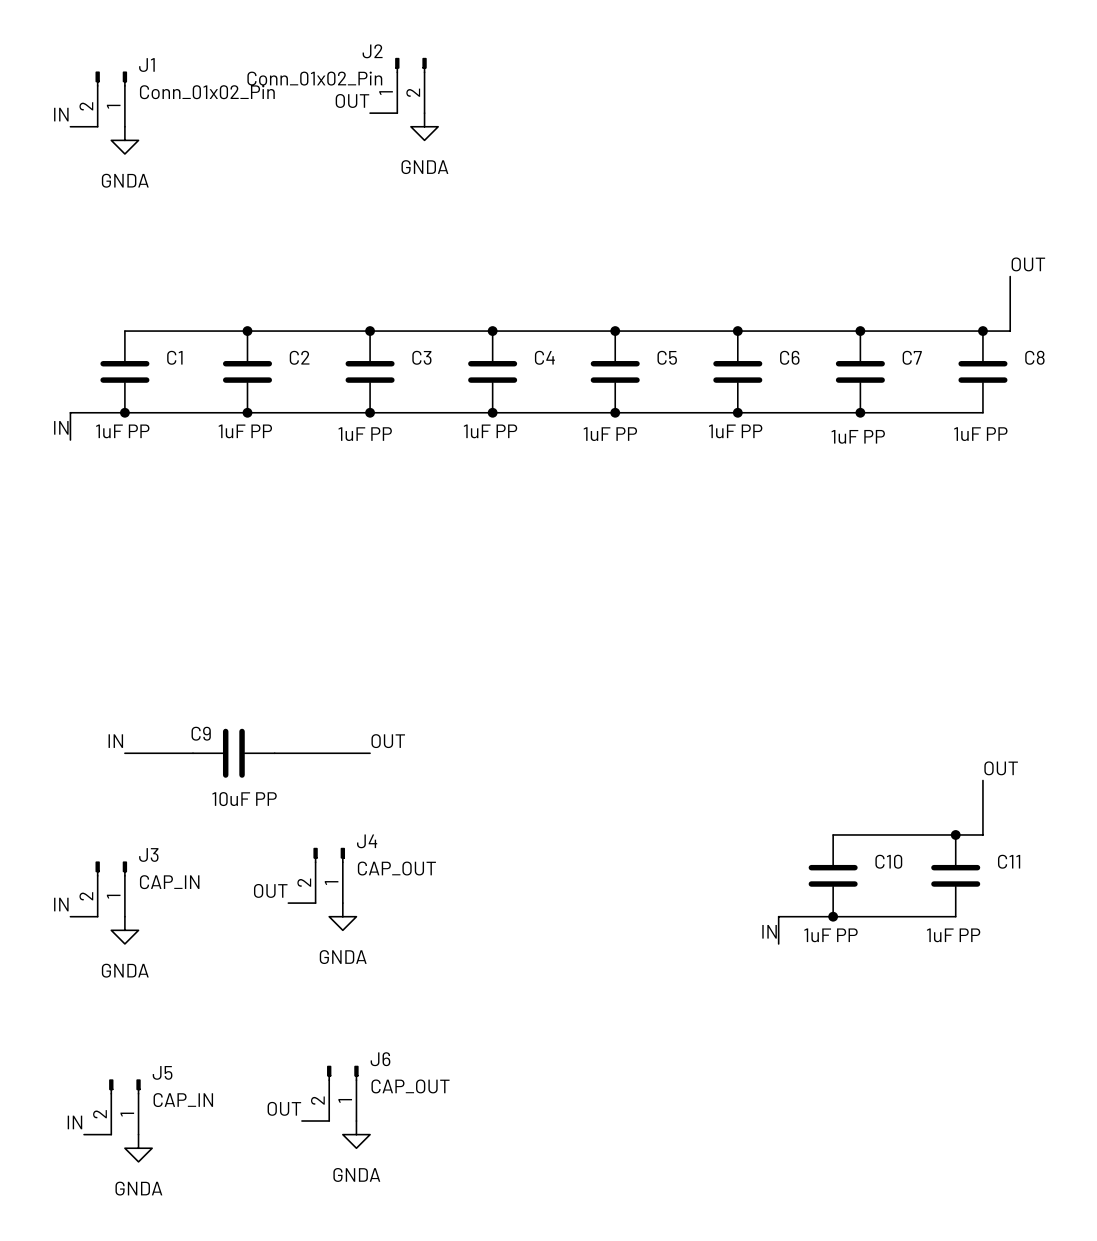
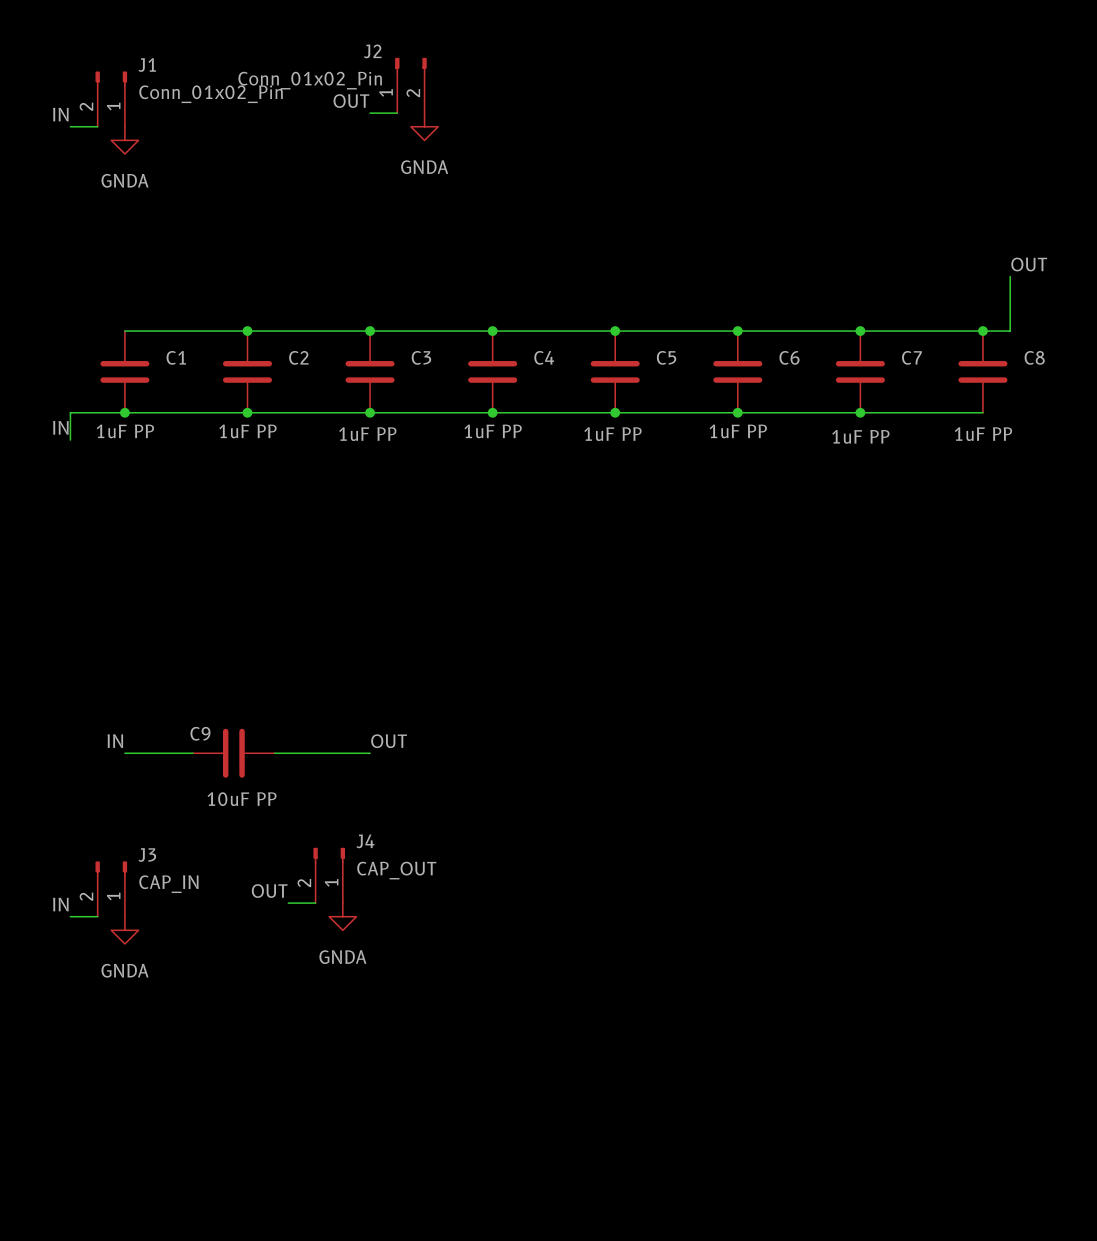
label: OUT (1001, 768) -> none
wire: (982, 780) (982, 834) (833, 834) -> none
junction: (955, 834) -> none
C10: 1uF PP (833, 875) -> none
C11: 1uF PP (955, 875) -> none
junction: (833, 916) -> none
wire: (955, 916) (778, 916) (778, 943) -> none
label: IN (769, 931) -> none
J6: CAP_OUT (342, 1093) -> none
J5: CAP_IN (124, 1106) -> none
label: OUT (284, 1108) -> none
wire: (301, 1121) (329, 1121) -> none
label: IN (74, 1122) -> none
wire: (84, 1134) (111, 1134) -> none
power symbol: GNDA (356, 1134) -> none
power symbol: GNDA (138, 1148) -> none

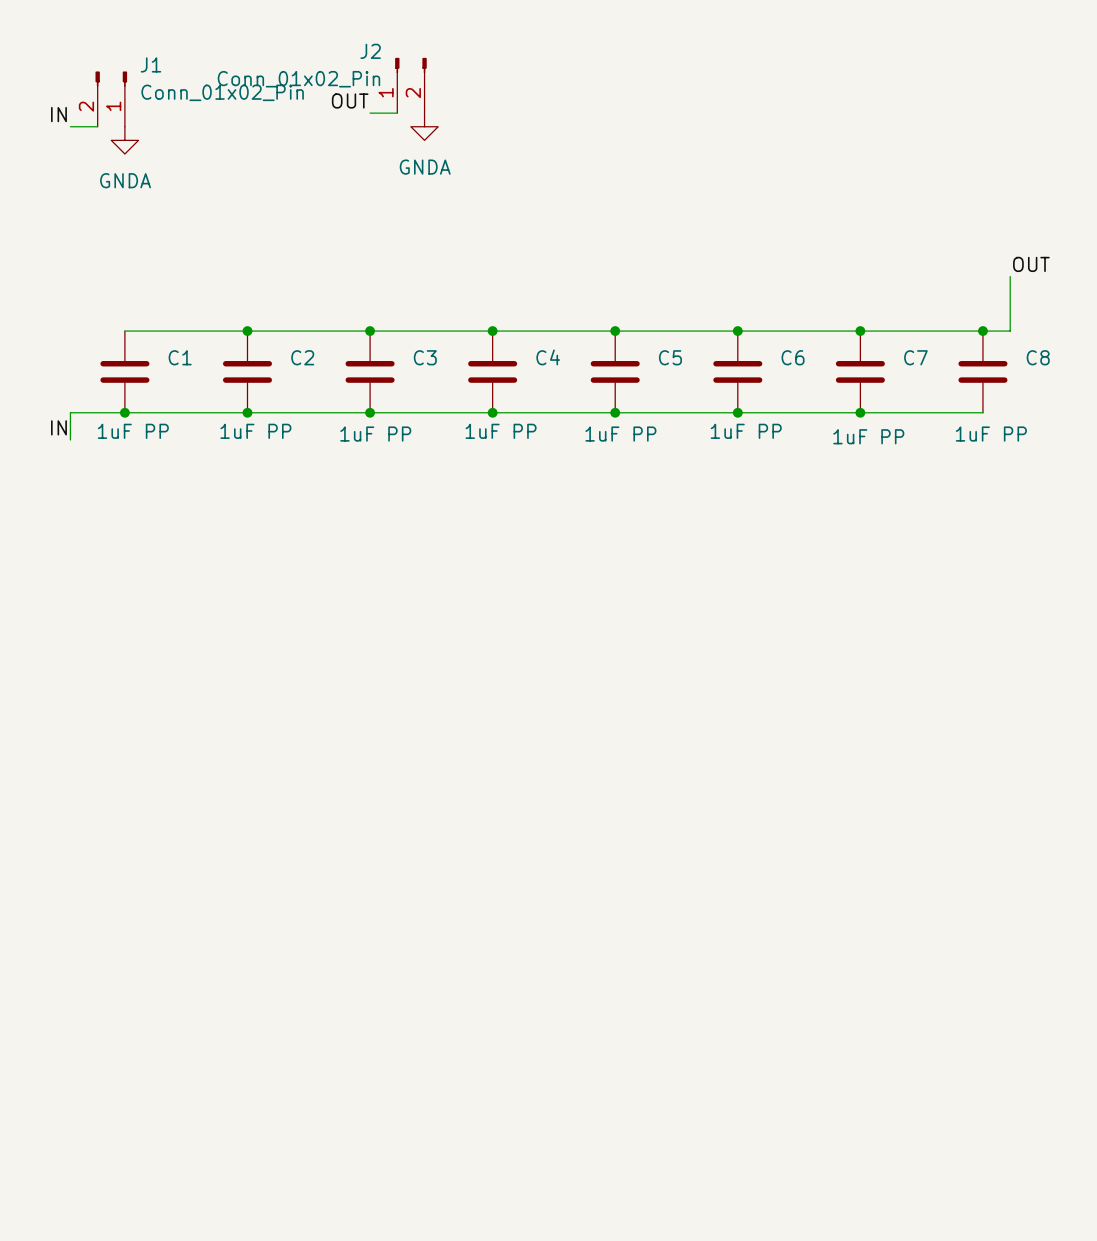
label: IN (115, 741) -> none
label: OUT (389, 741) -> none
wire: (124, 753) (193, 753) -> none
C9: 10uF PP (233, 753) -> none
wire: (274, 753) (370, 753) -> none
J4: CAP_OUT (329, 875) -> none
J3: CAP_IN (111, 889) -> none
label: OUT (269, 891) -> none
wire: (288, 903) (315, 903) -> none
label: IN (60, 904) -> none
wire: (70, 916) (97, 916) -> none
power symbol: GNDA (342, 916) -> none
power symbol: GNDA (124, 930) -> none

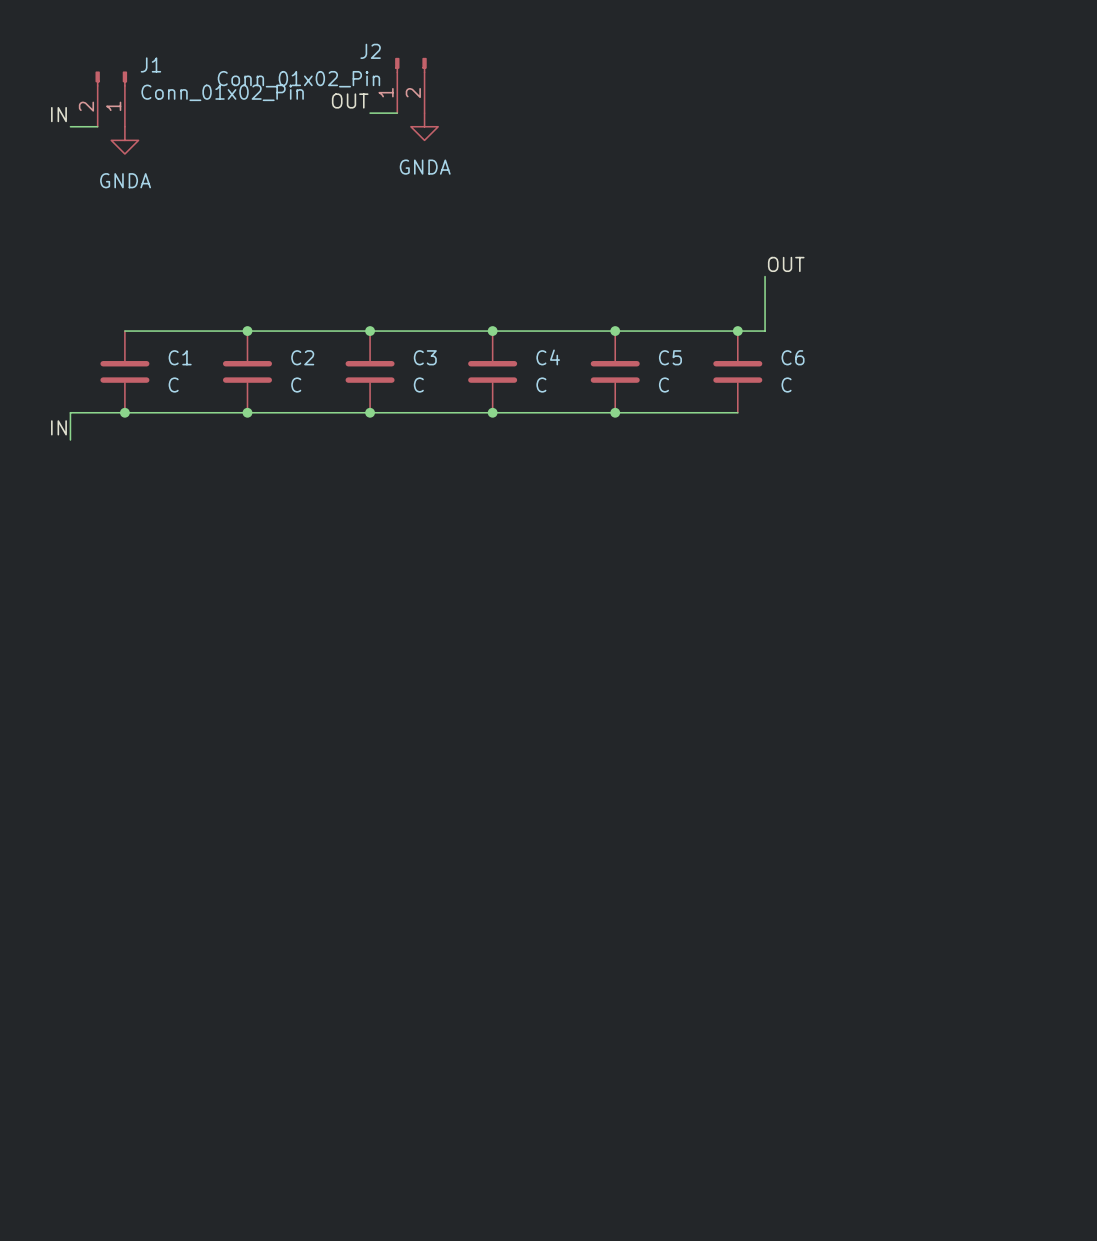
label position: OUT (1031, 264) -> OUT (786, 264)
wire: (1010, 276) (1010, 331) (765, 331) -> (765, 276) (765, 331)
junction: (860, 331) -> none
junction: (982, 331) -> none
C7: 1uF PP (860, 371) -> none
C8: 1uF PP (982, 371) -> none
wire: (737, 412) (982, 412) -> none
junction: (737, 412) -> none
junction: (860, 412) -> none
C1 value: 1uF PP (133, 431) -> C (173, 385)
C2 value: 1uF PP (255, 431) -> C (296, 385)
C4 value: 1uF PP (501, 431) -> C (541, 385)
C6 value: 1uF PP (746, 431) -> C (786, 385)
C3 value: 1uF PP (375, 434) -> C (418, 385)
C5 value: 1uF PP (620, 434) -> C (663, 385)

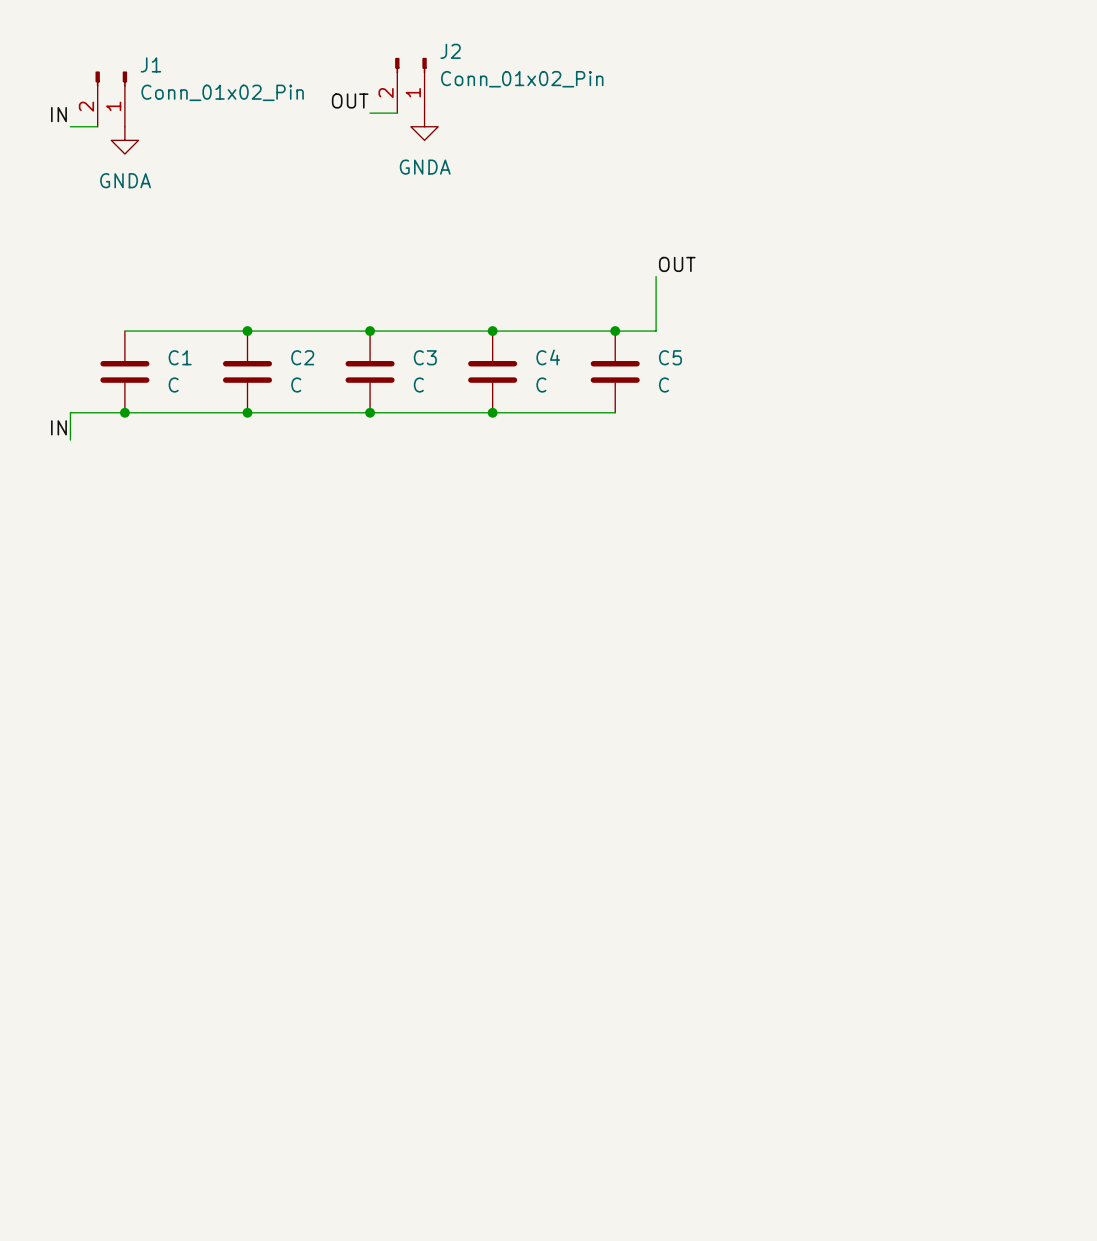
J2 flip: as is (410, 65) -> left-right (410, 65)
label position: OUT (786, 264) -> OUT (677, 264)
wire: (765, 276) (765, 331) (656, 331) -> (656, 276) (656, 331)
junction: (737, 331) -> none
C6: C (737, 371) -> none
wire: (615, 412) (737, 412) -> none
junction: (615, 412) -> none

